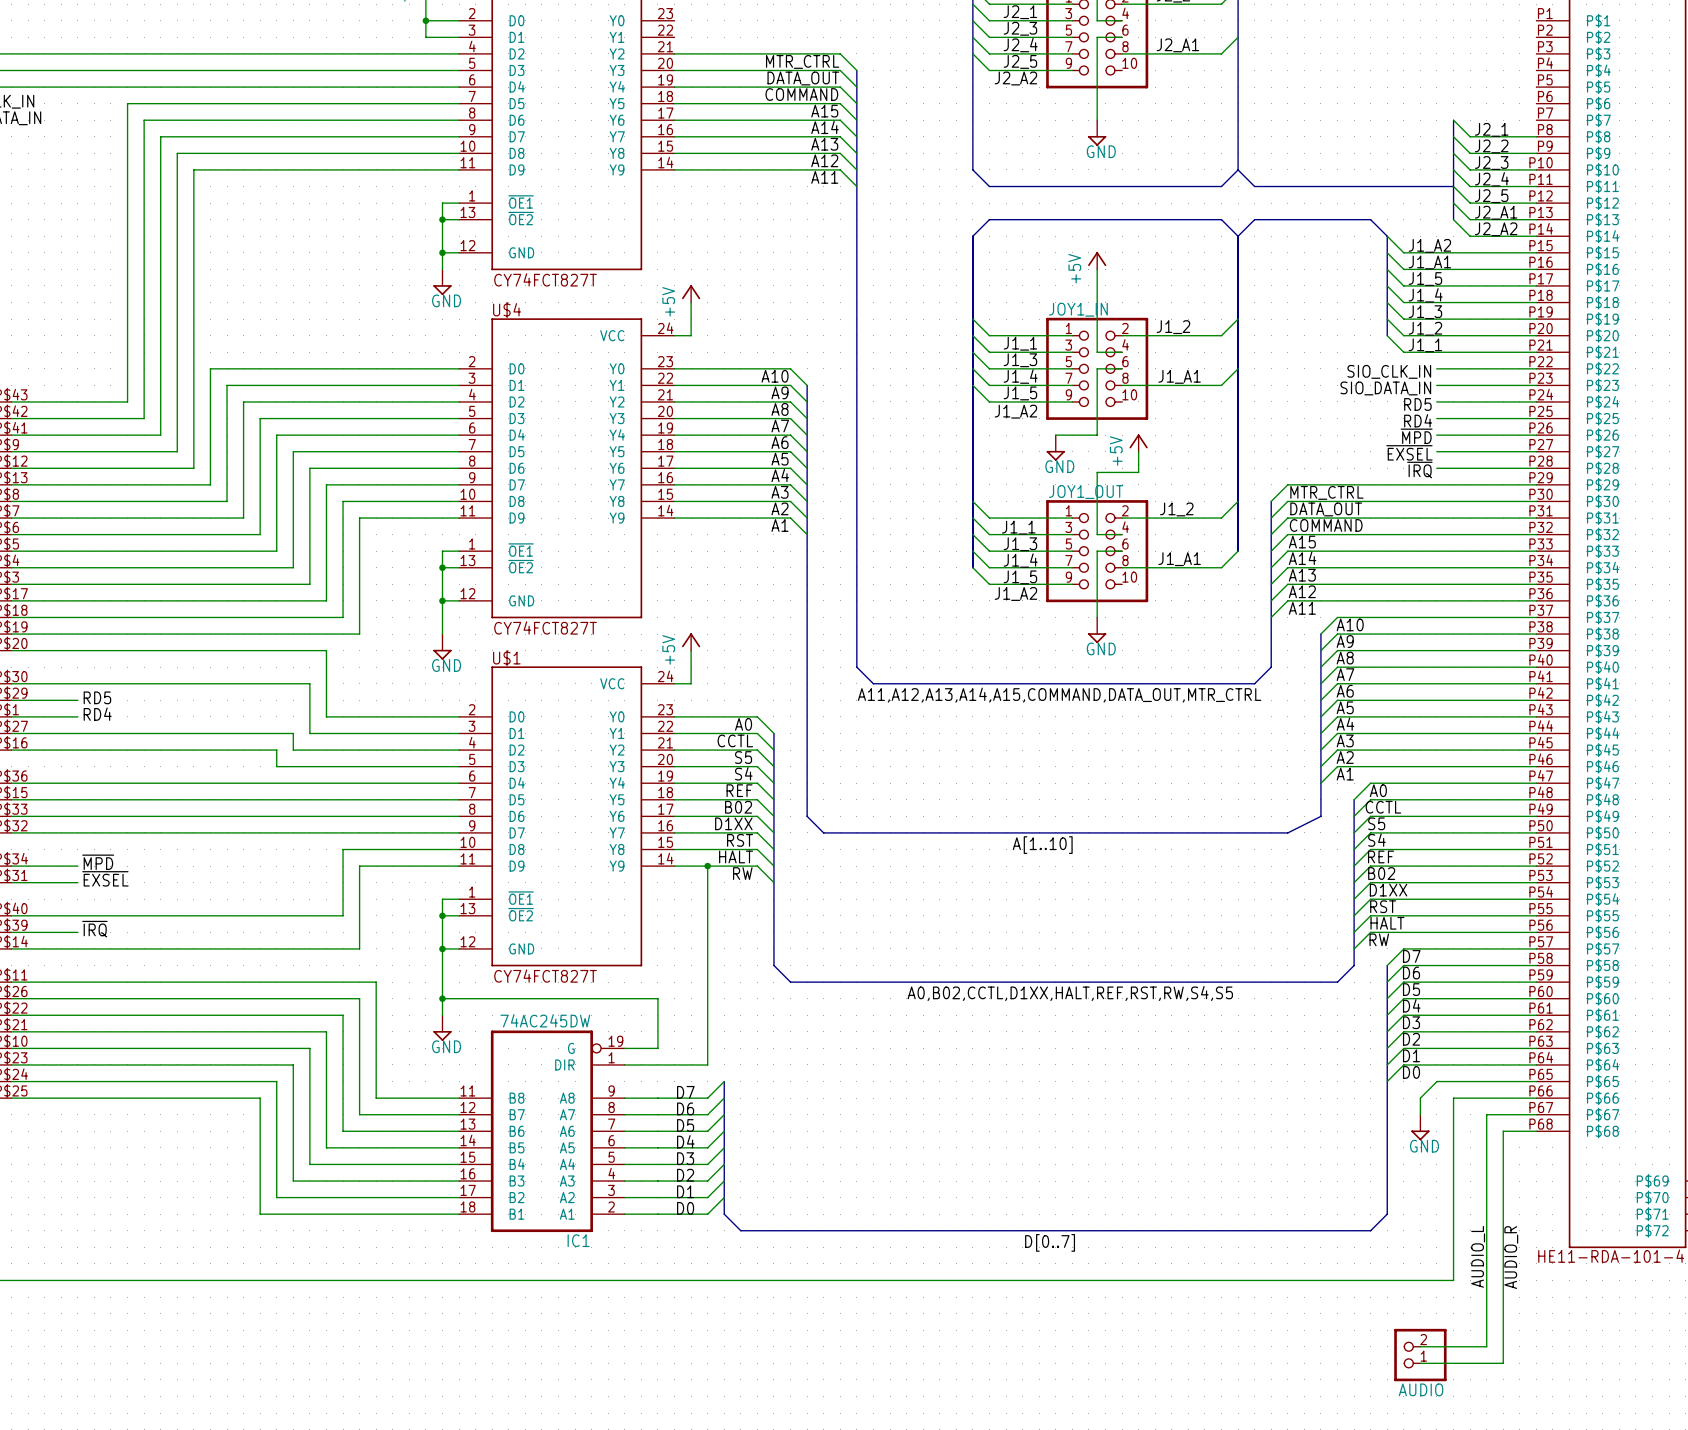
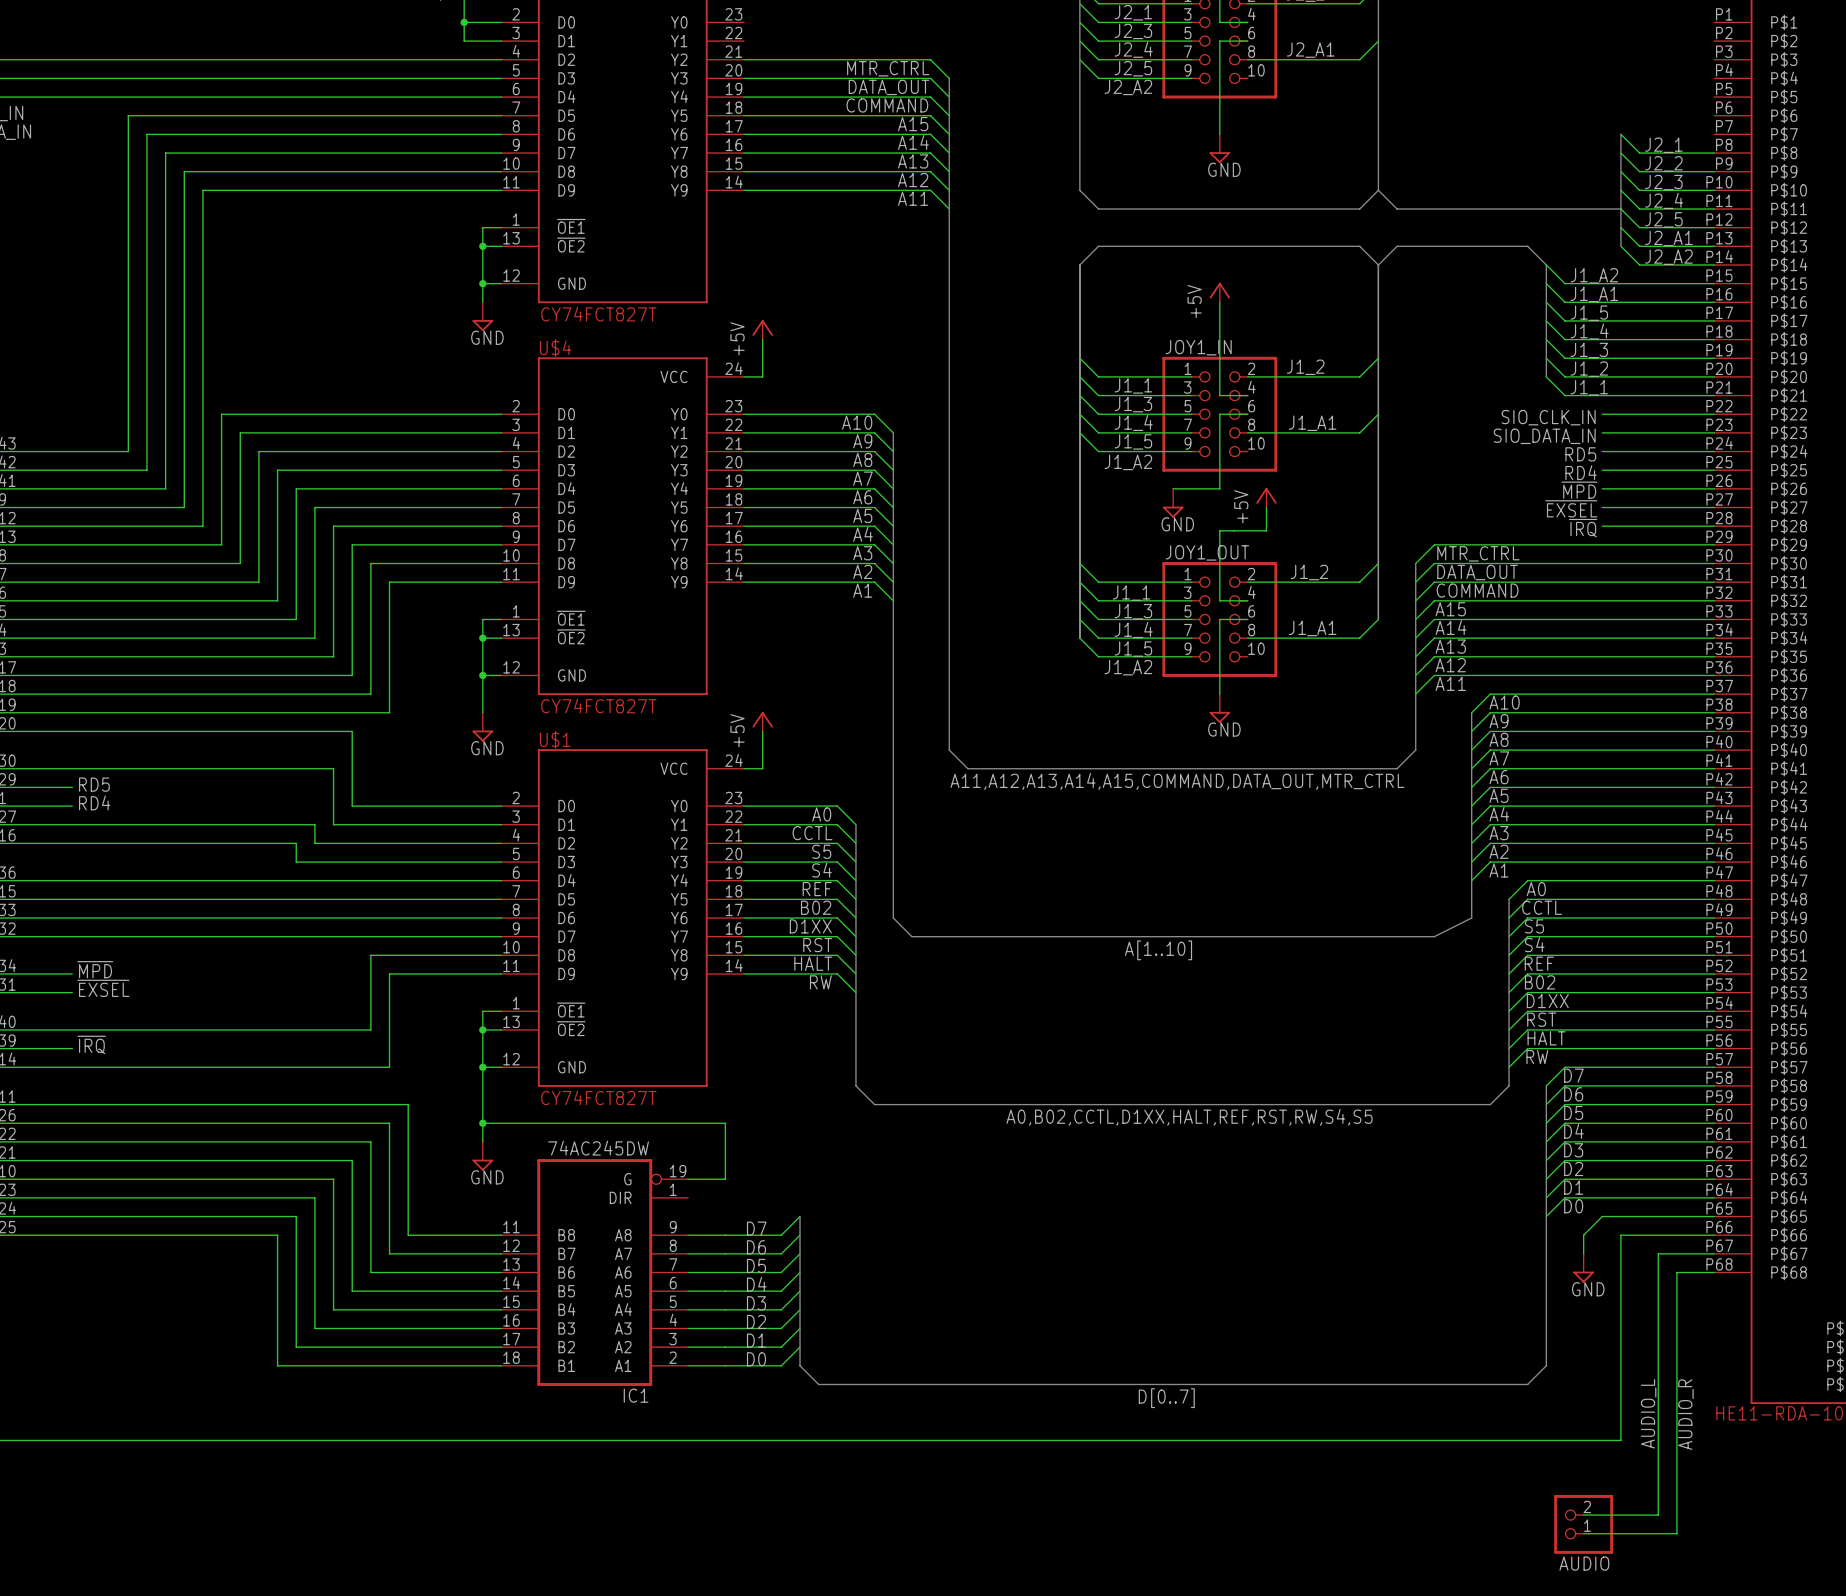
wire: (707, 866) (707, 1064) (624, 1064) -> none
junction: (707, 866) -> none

